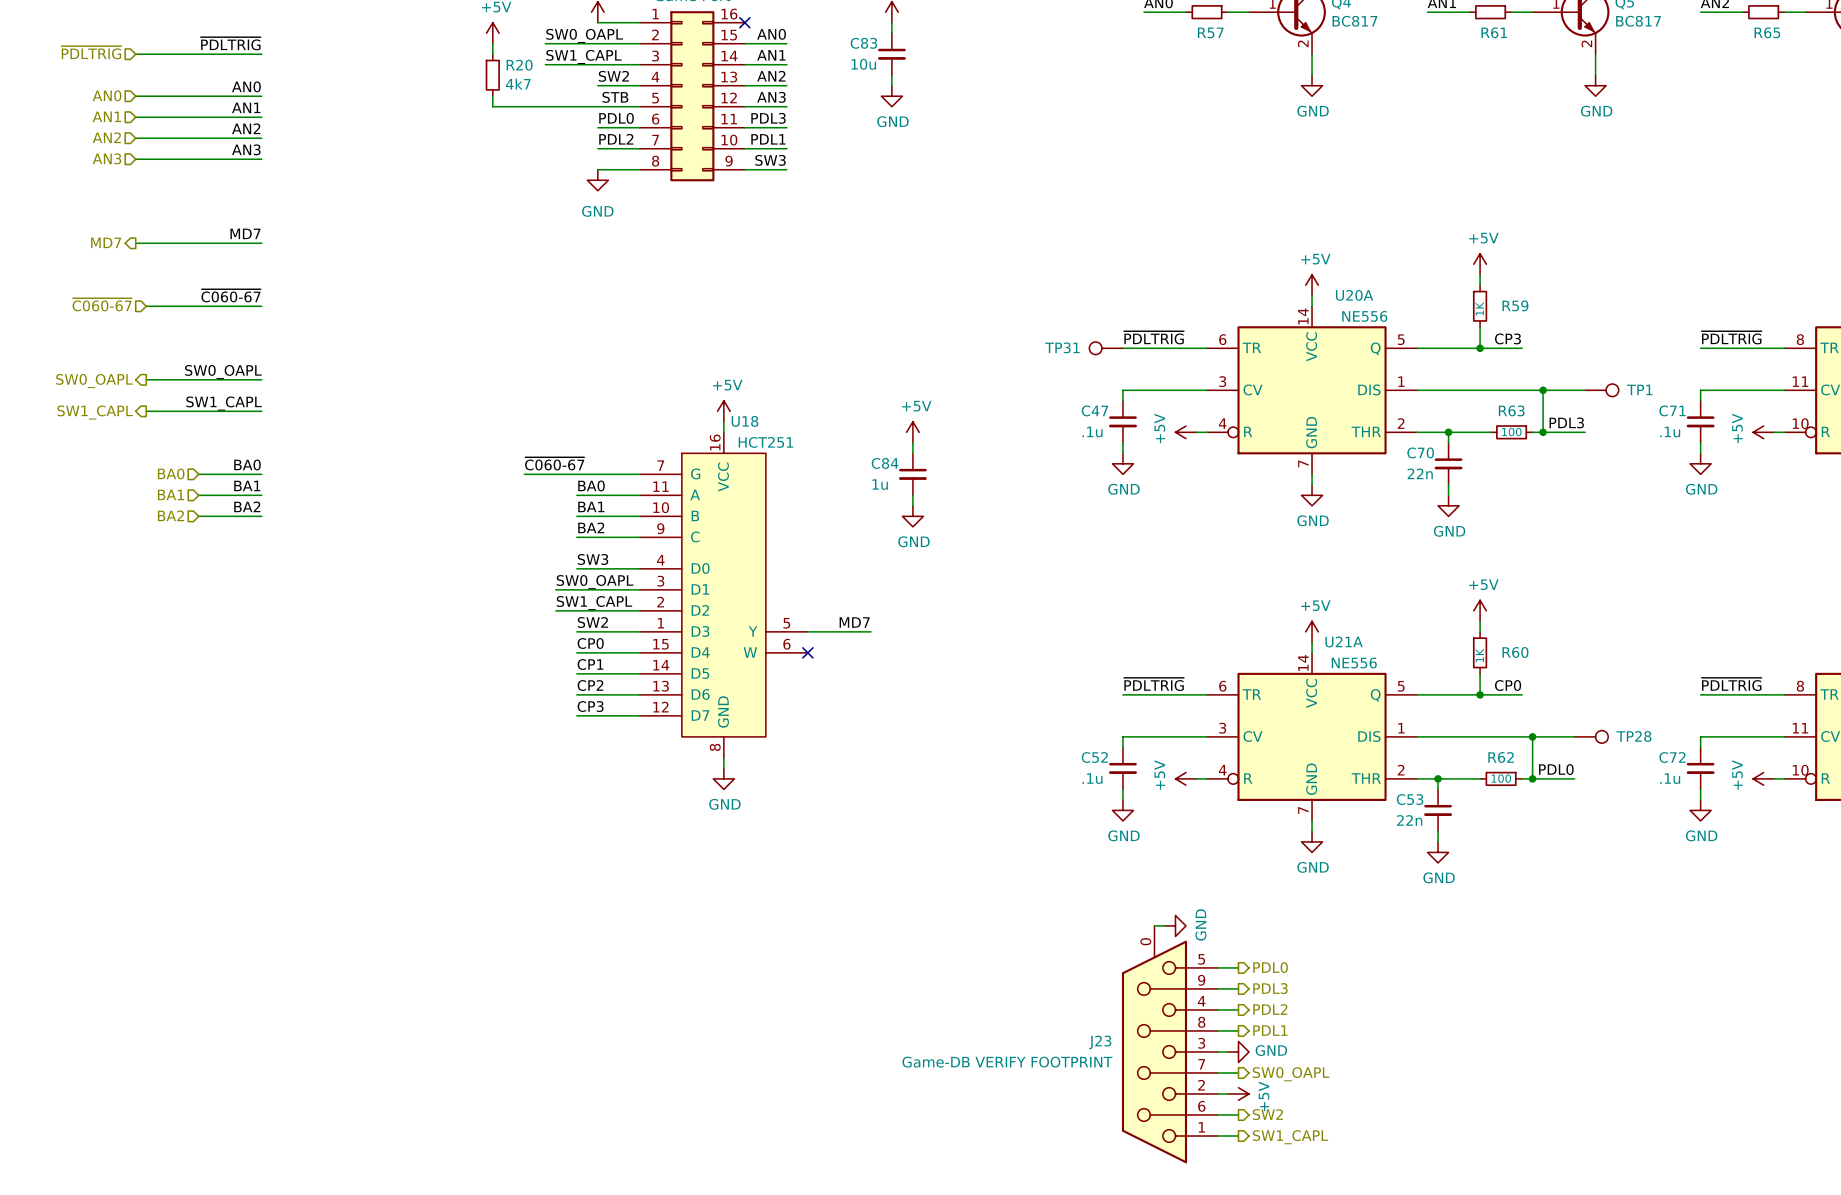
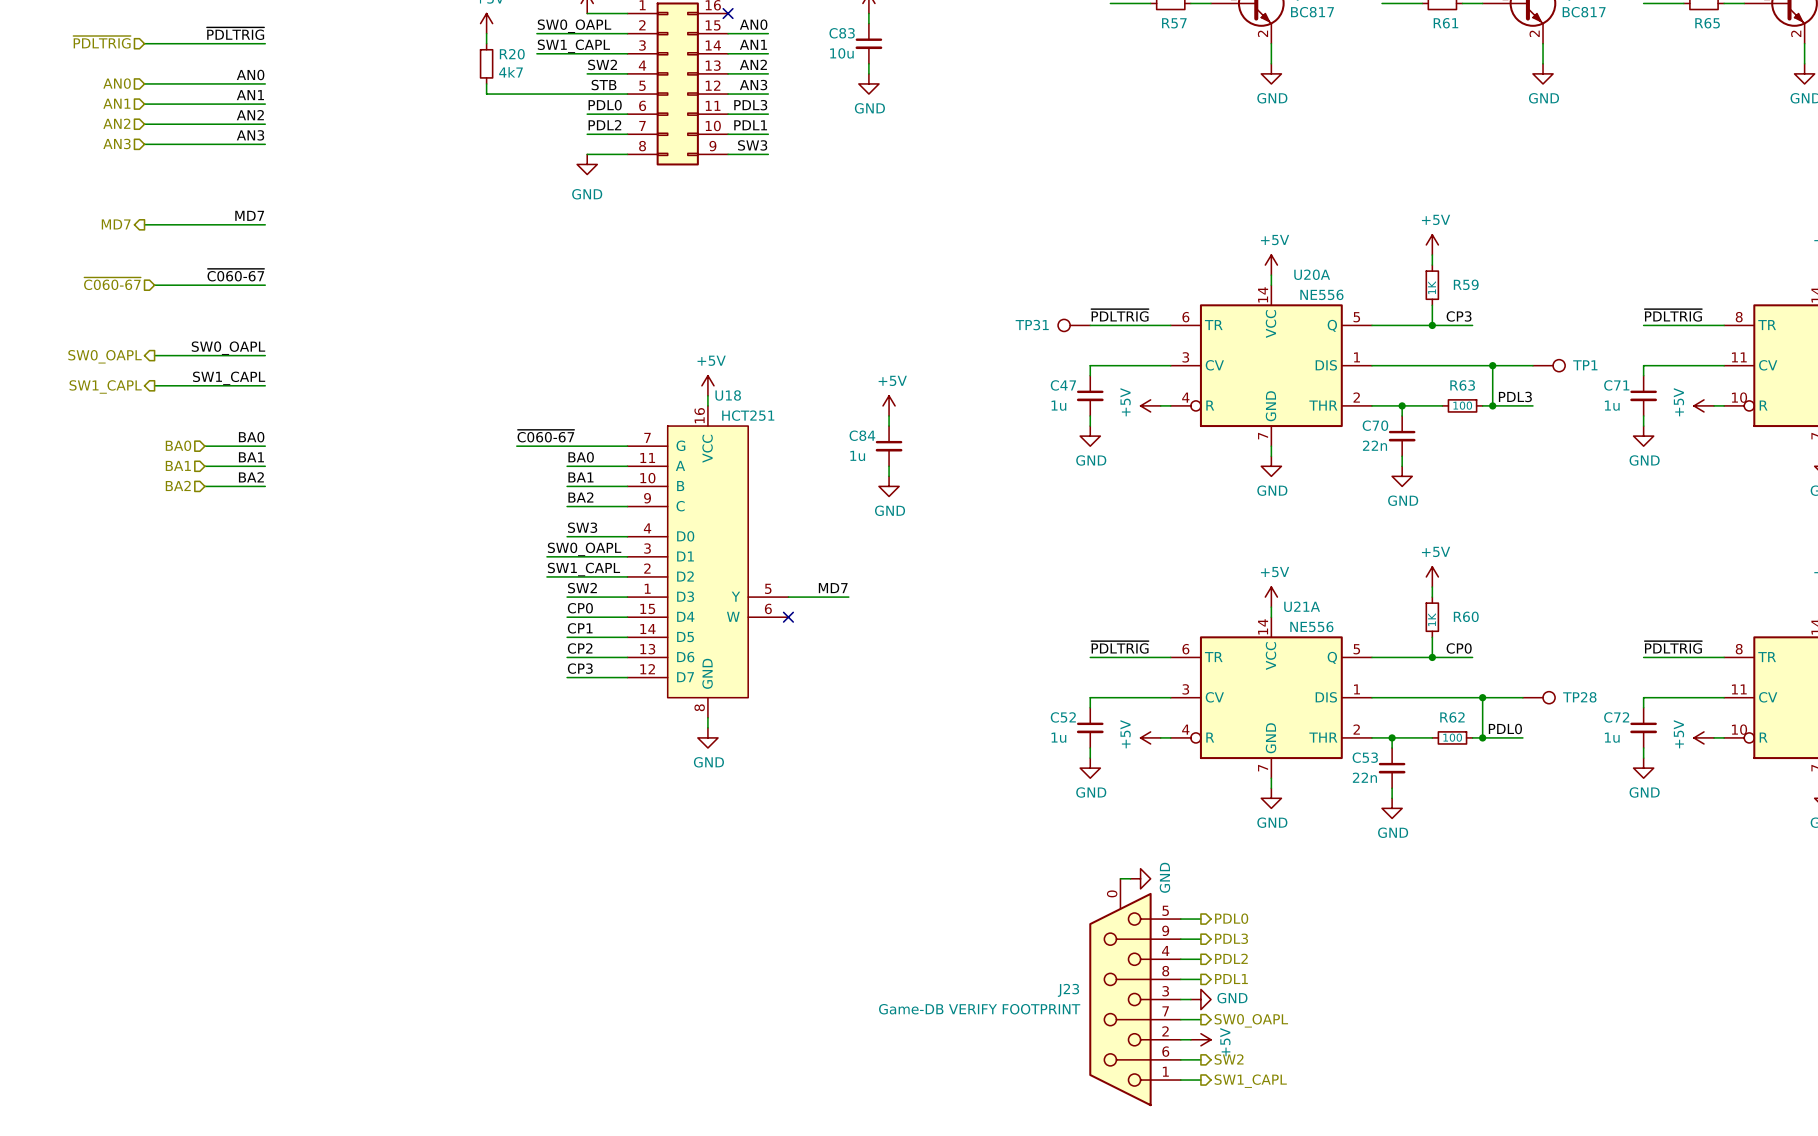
C47 value: .1u (1092, 432) -> 1u (1058, 405)
C71 value: .1u (1670, 432) -> 1u (1612, 405)
C52 value: .1u (1092, 778) -> 1u (1058, 737)
C72 value: .1u (1670, 778) -> 1u (1612, 737)

